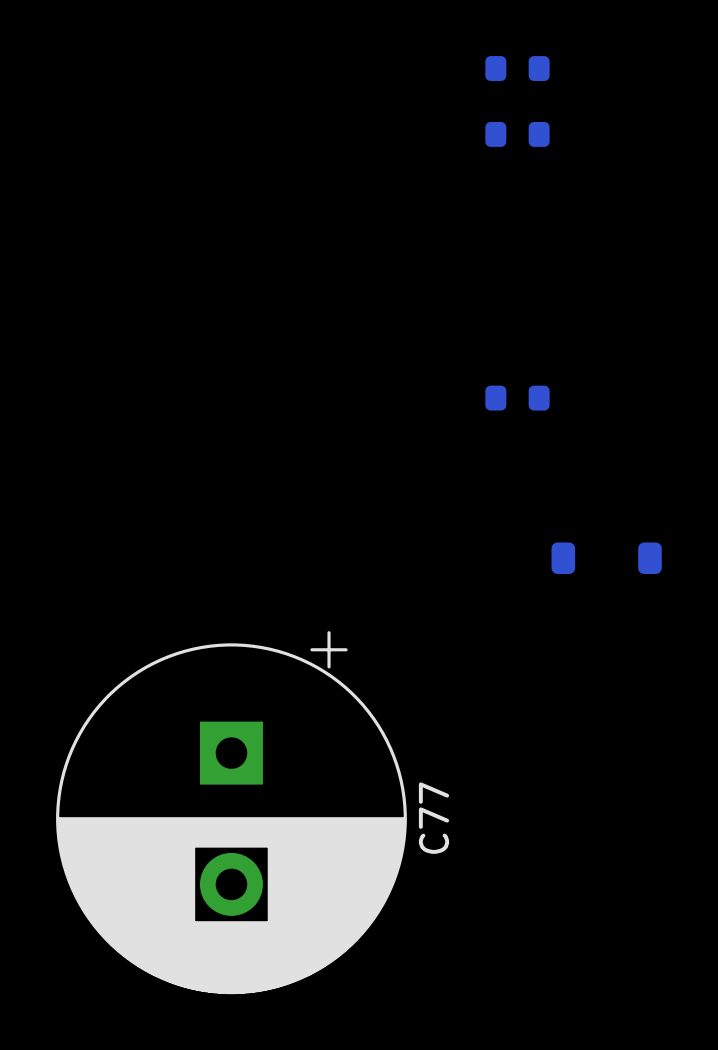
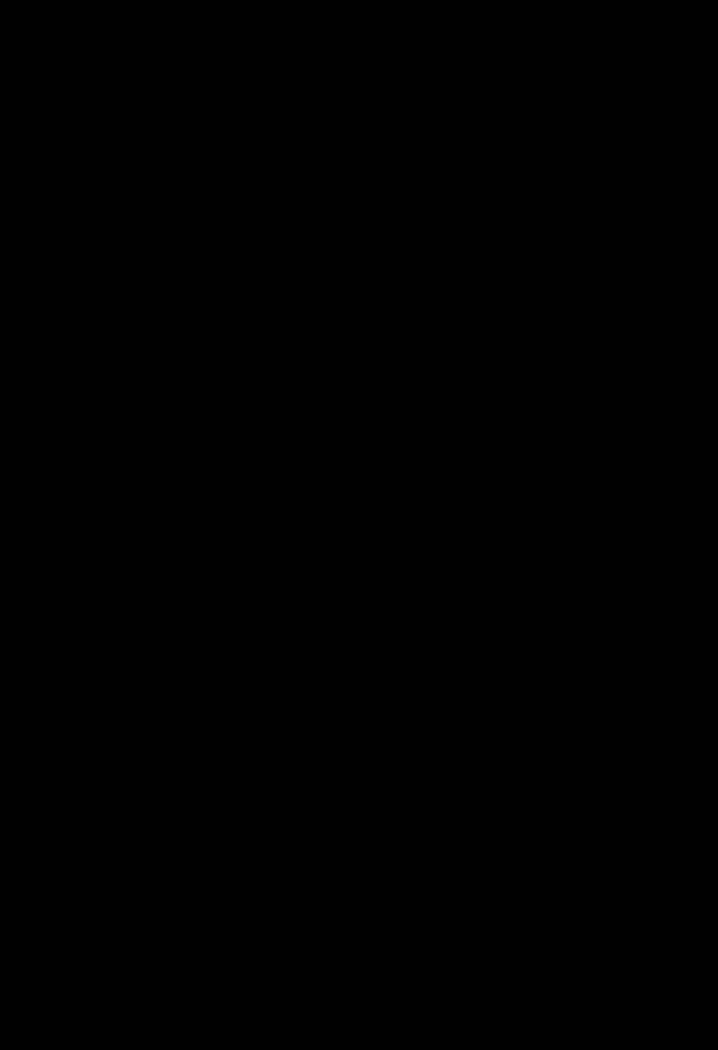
part: (517, 68) -> none
part: (517, 134) -> none
part: (517, 398) -> none
part: (606, 558) -> none
C77: (231, 812) -> none

